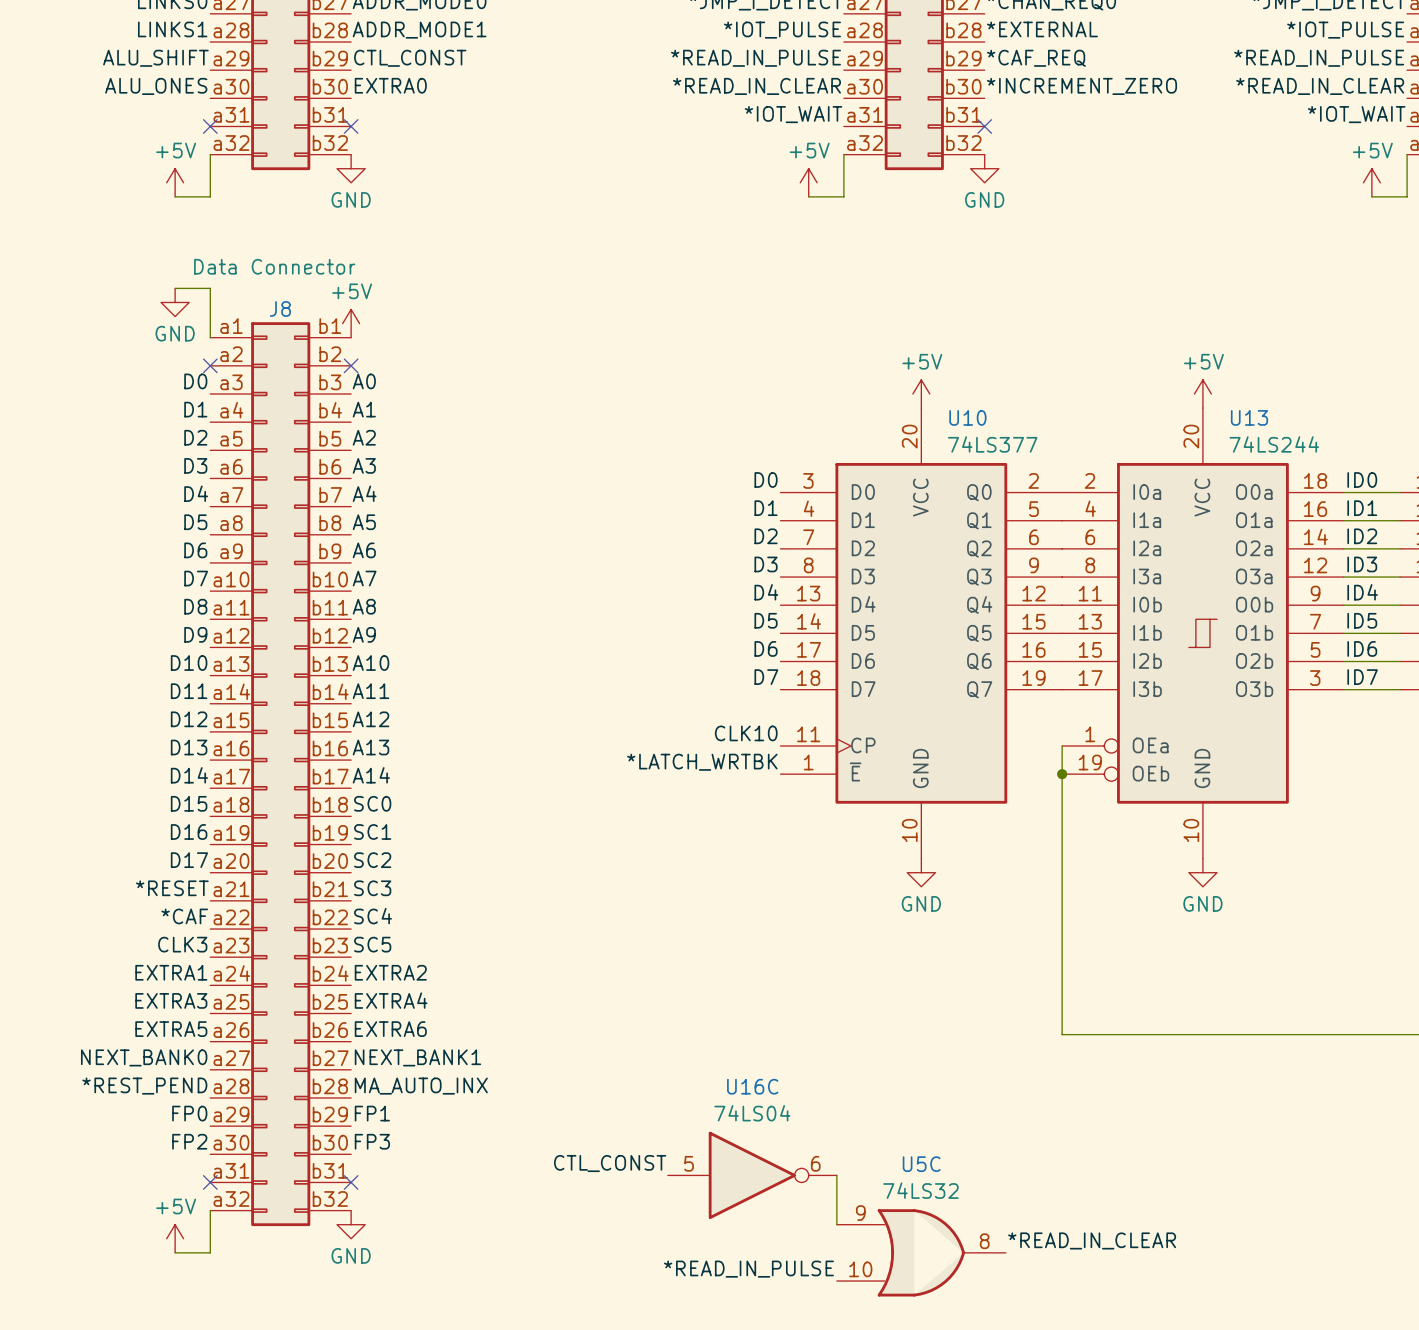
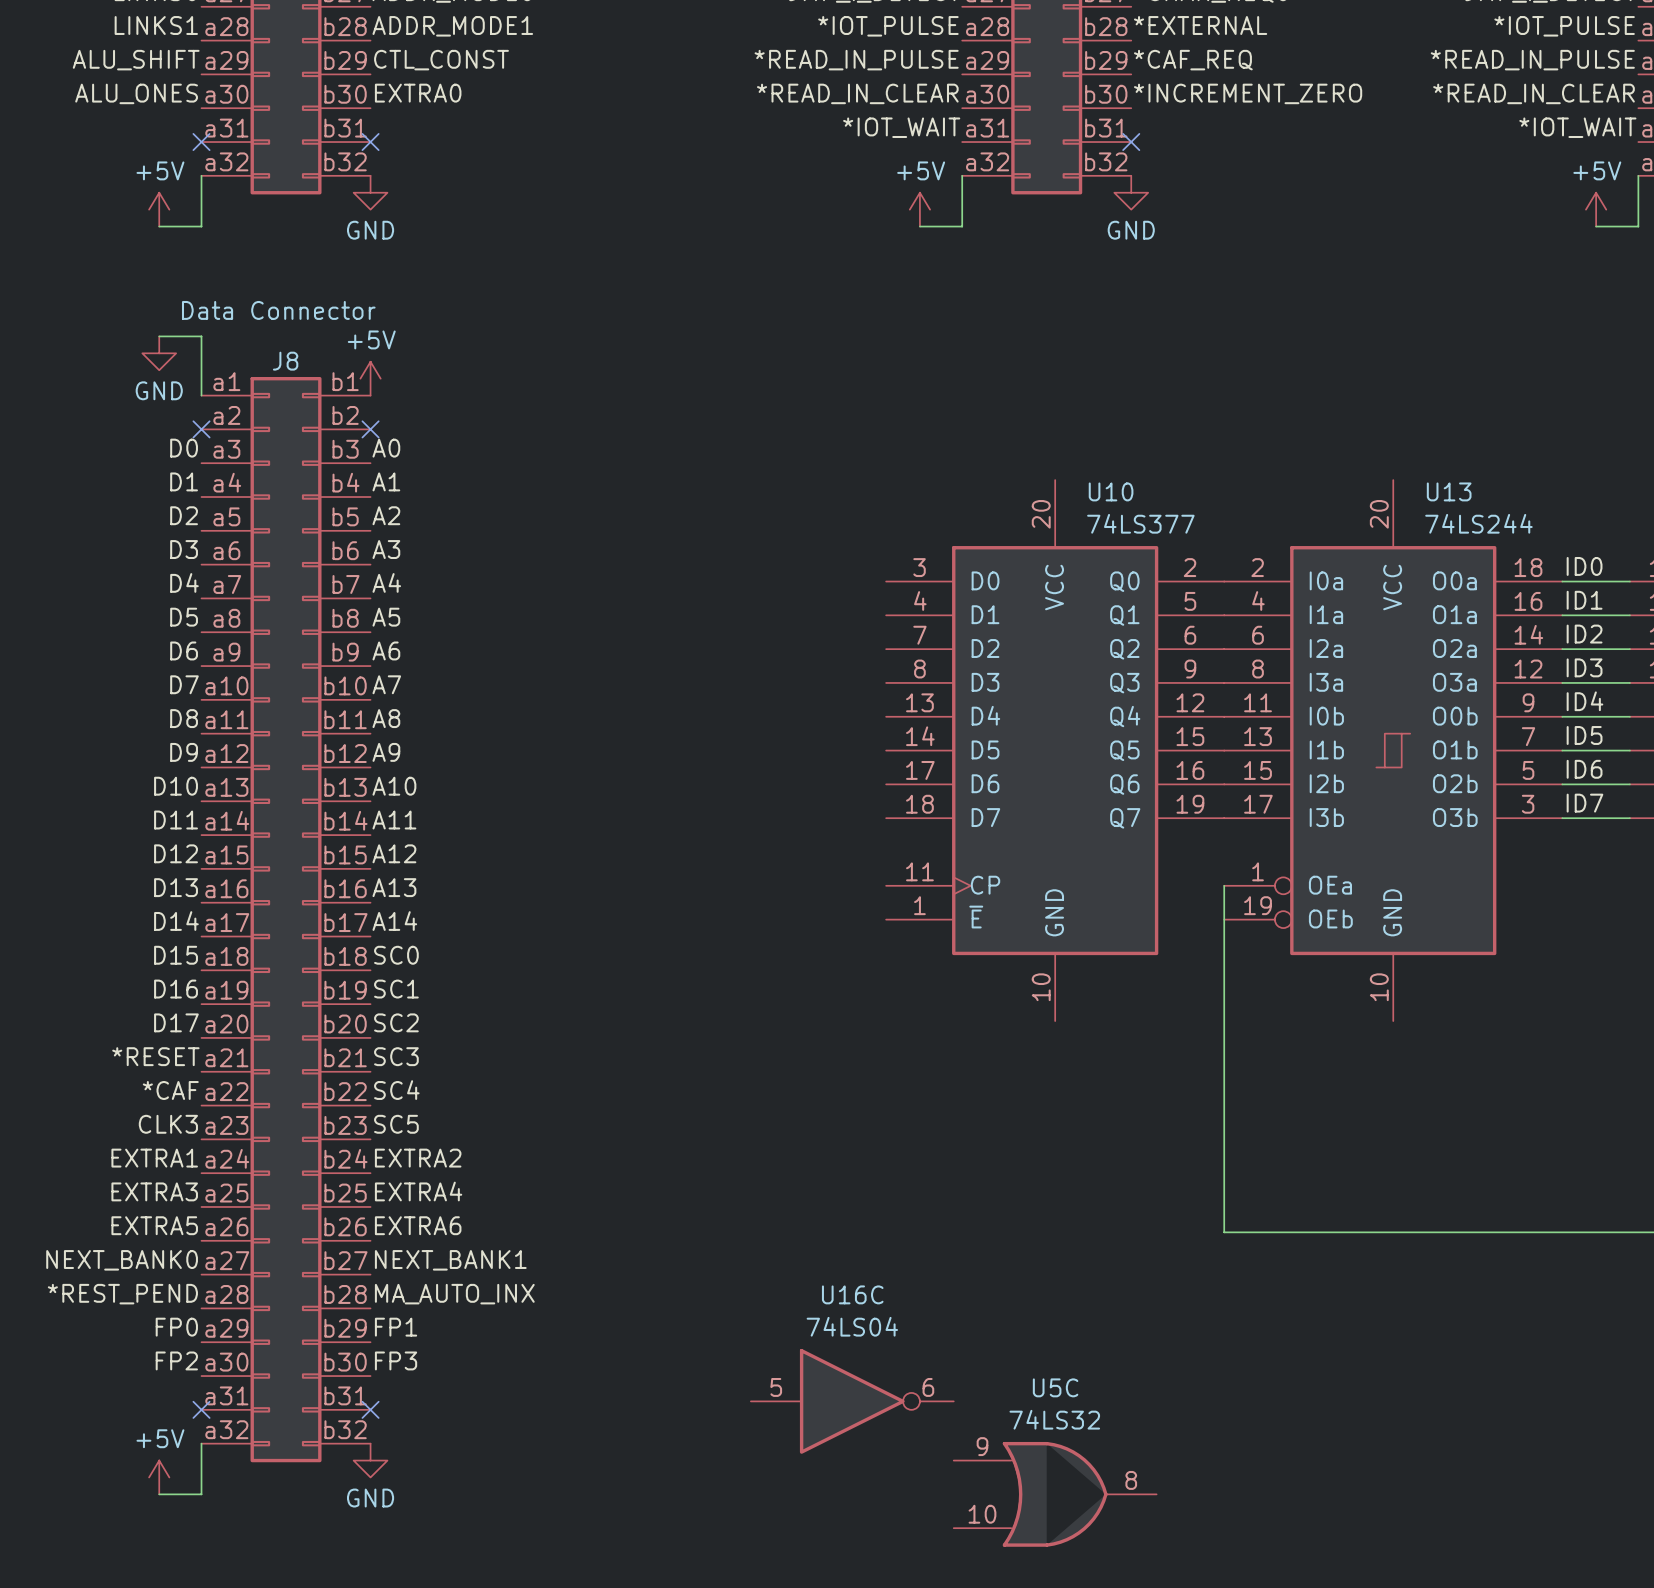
power symbol: +5V (921, 394) -> none
power symbol: +5V (1202, 394) -> none
label: D0 (766, 479) -> none
label: D1 (766, 508) -> none
label: D2 (766, 536) -> none
label: D3 (766, 564) -> none
label: D4 (766, 592) -> none
label: D5 (766, 620) -> none
label: D6 (766, 648) -> none
label: D7 (766, 677) -> none
label: CLK10 (746, 733) -> none
label: *LATCH_WRTBK (702, 762) -> none
junction: (1062, 774) -> none
power symbol: GND (921, 872) -> none
power symbol: GND (1202, 872) -> none
label: CTL_CONST (610, 1163) -> none
wire: (836, 1175) (836, 1224) -> none
label: *READ_IN_CLEAR (1092, 1240) -> none
label: *READ_IN_PULSE (748, 1269) -> none

